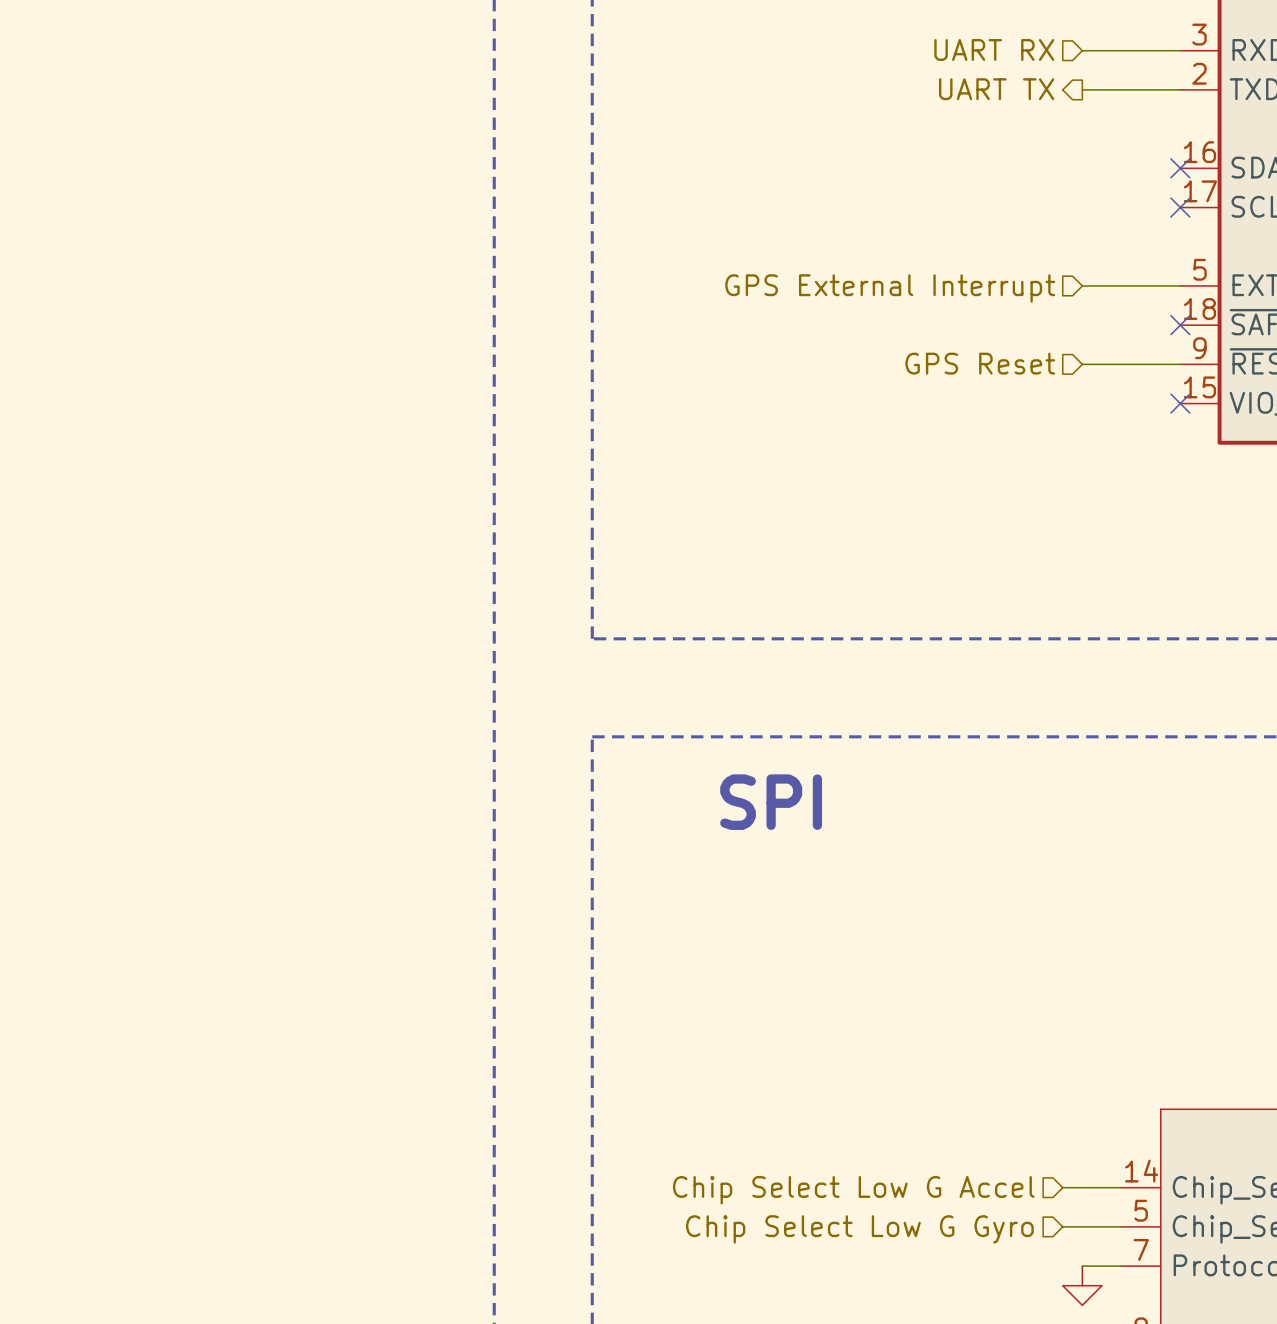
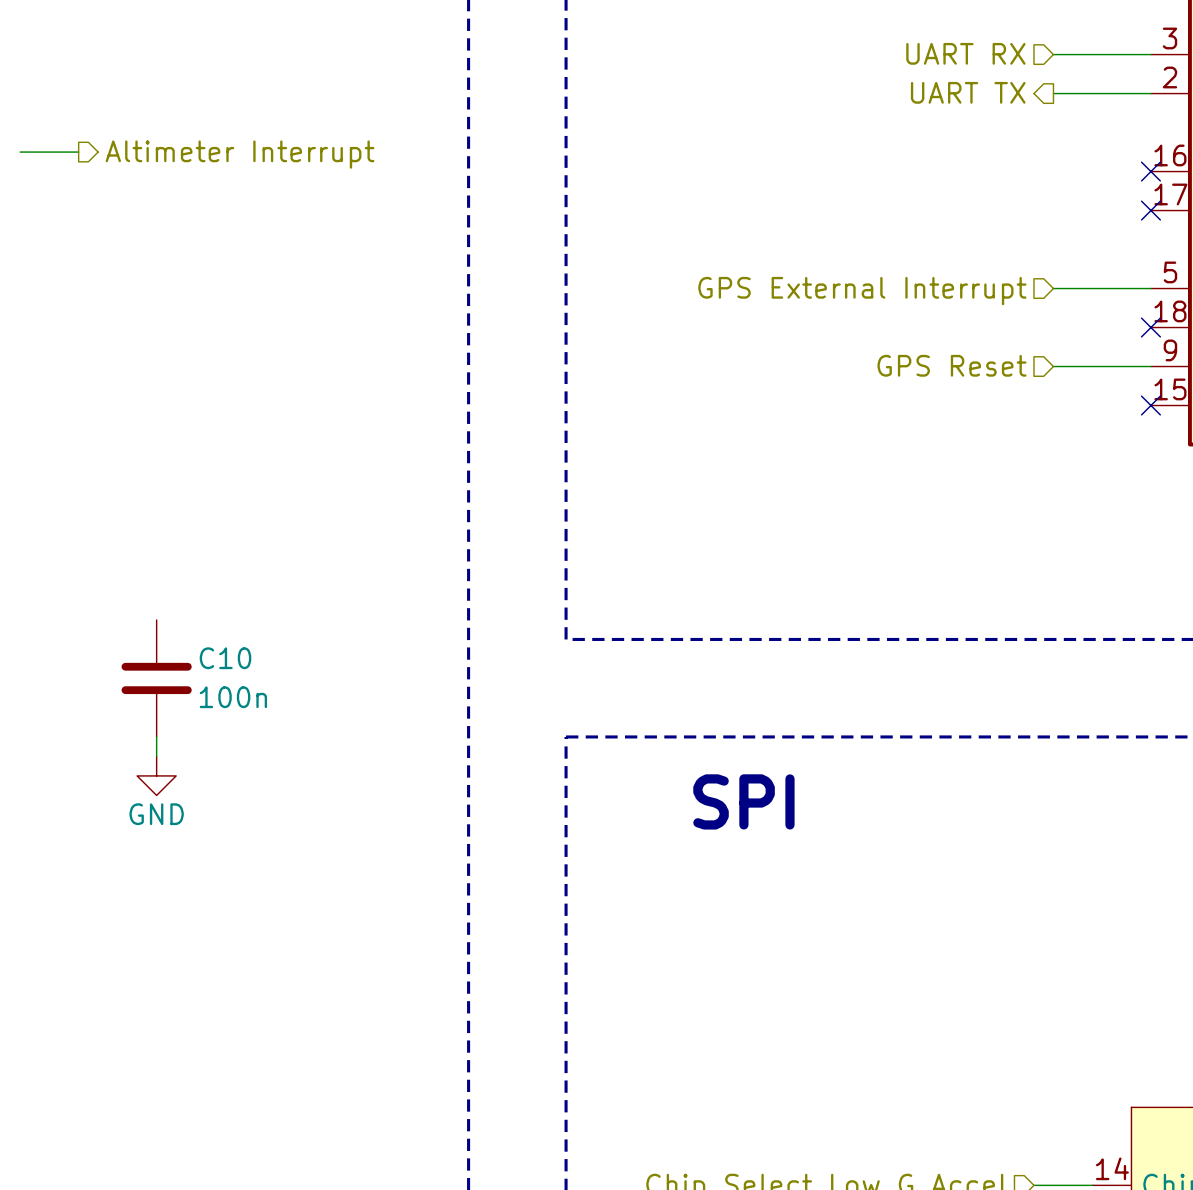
wire: none -> (20, 152) (78, 152)
hierarchical label: none -> Altimeter Interrupt (240, 154)
C10: none -> 100n (156, 678)
wire: none -> (156, 736) (156, 756)
power symbol: none -> GND (156, 775)

